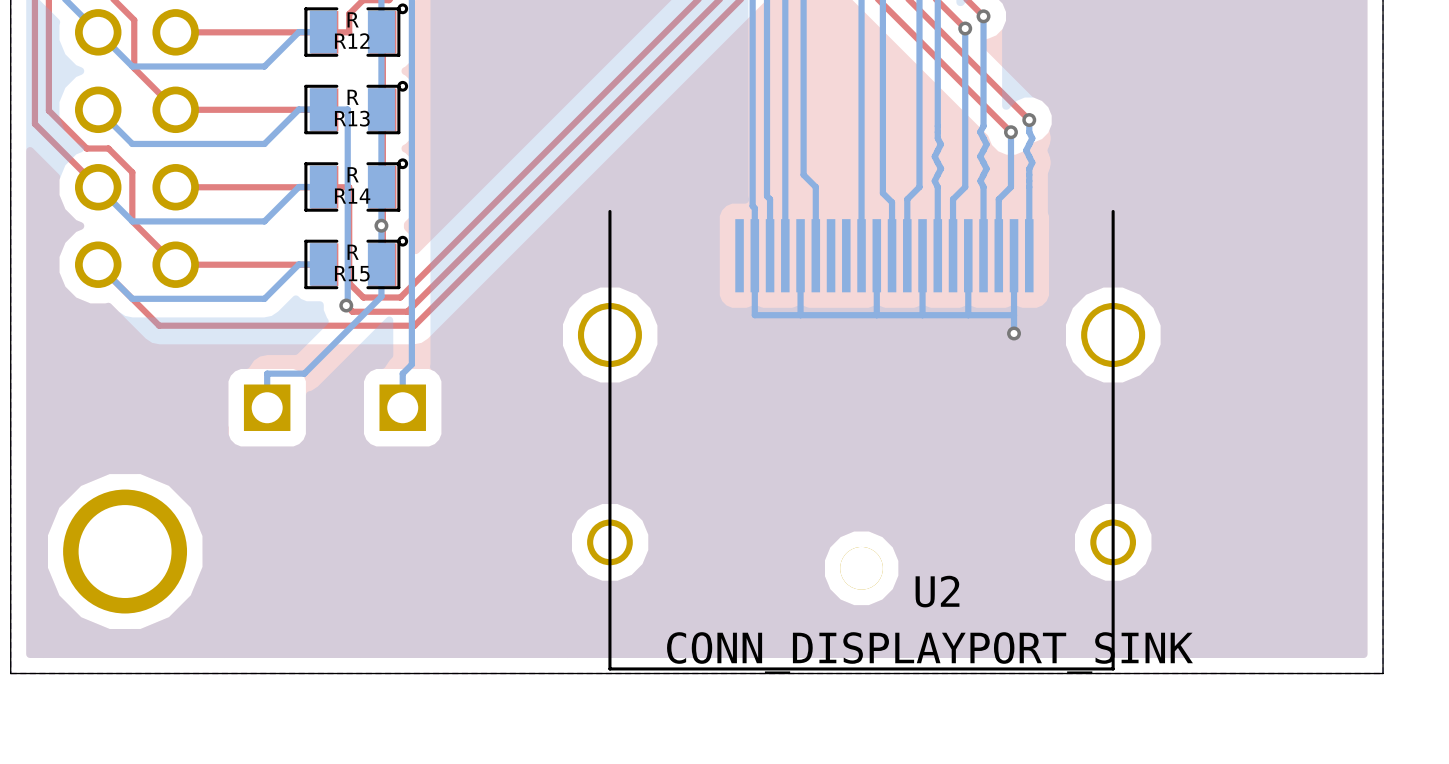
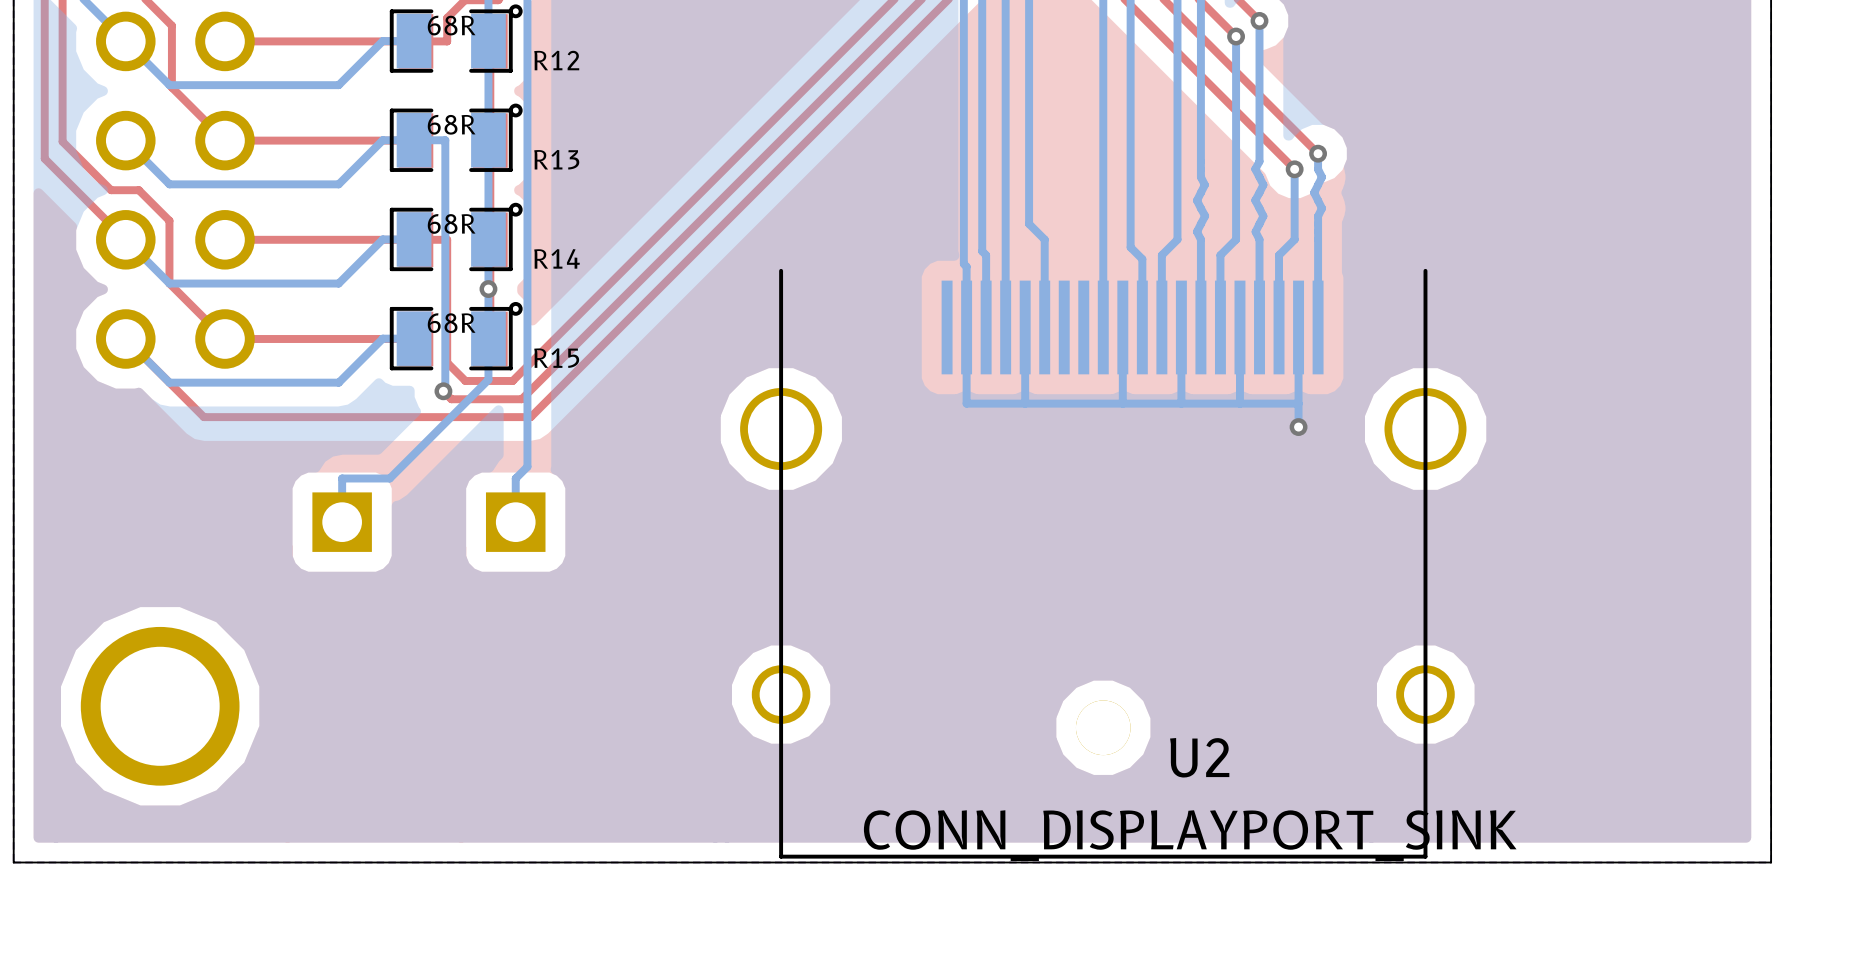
R12 value: R (353, 19) -> 68R (451, 25)
R12 name position: R12 (352, 41) -> R12 (556, 60)
R13 value: R (353, 97) -> 68R (451, 124)
R13 name position: R13 (352, 118) -> R13 (556, 159)
R14 value: R (353, 174) -> 68R (451, 223)
R14 name position: R14 (352, 196) -> R14 (557, 258)
R15 value: R (353, 252) -> 68R (451, 323)
R15 name position: R15 (352, 273) -> R15 (556, 358)

